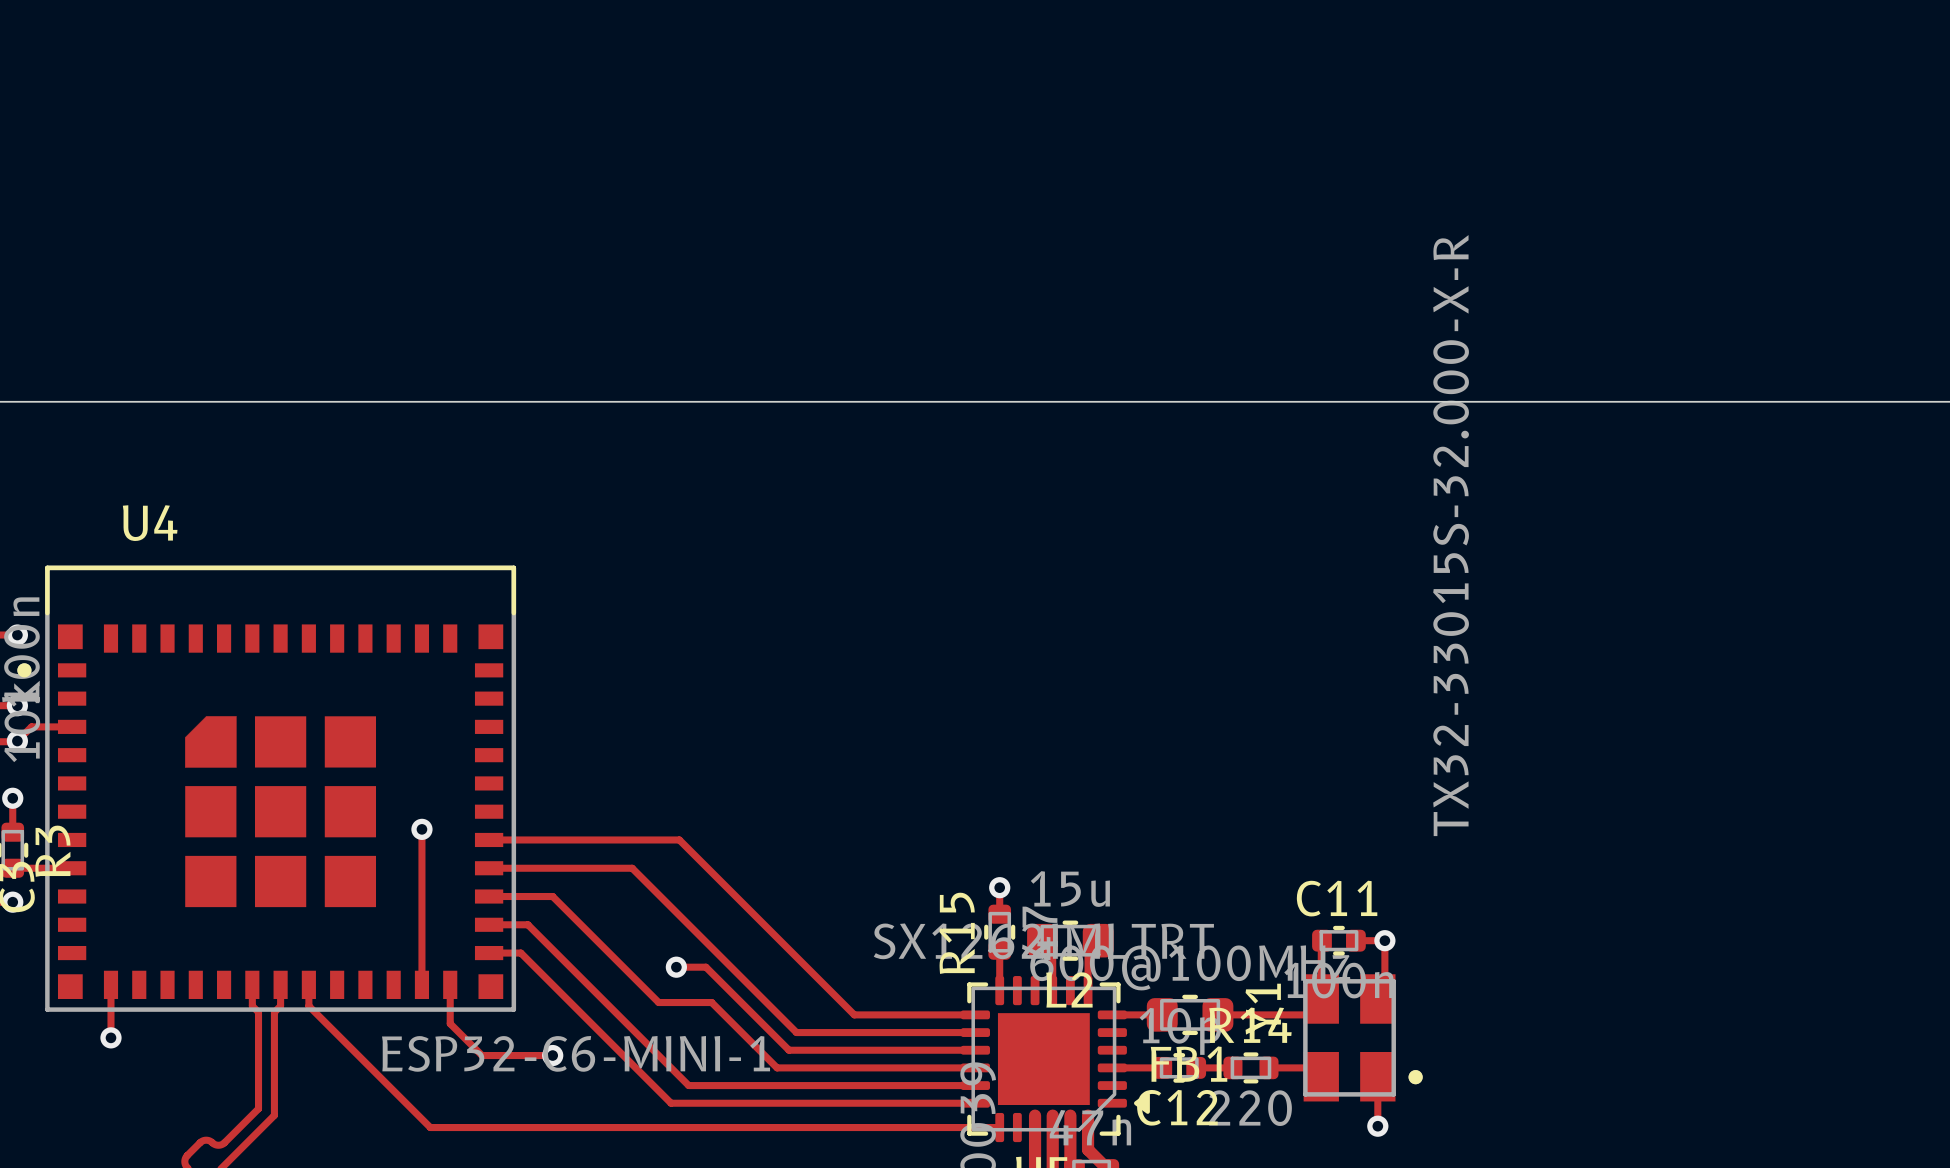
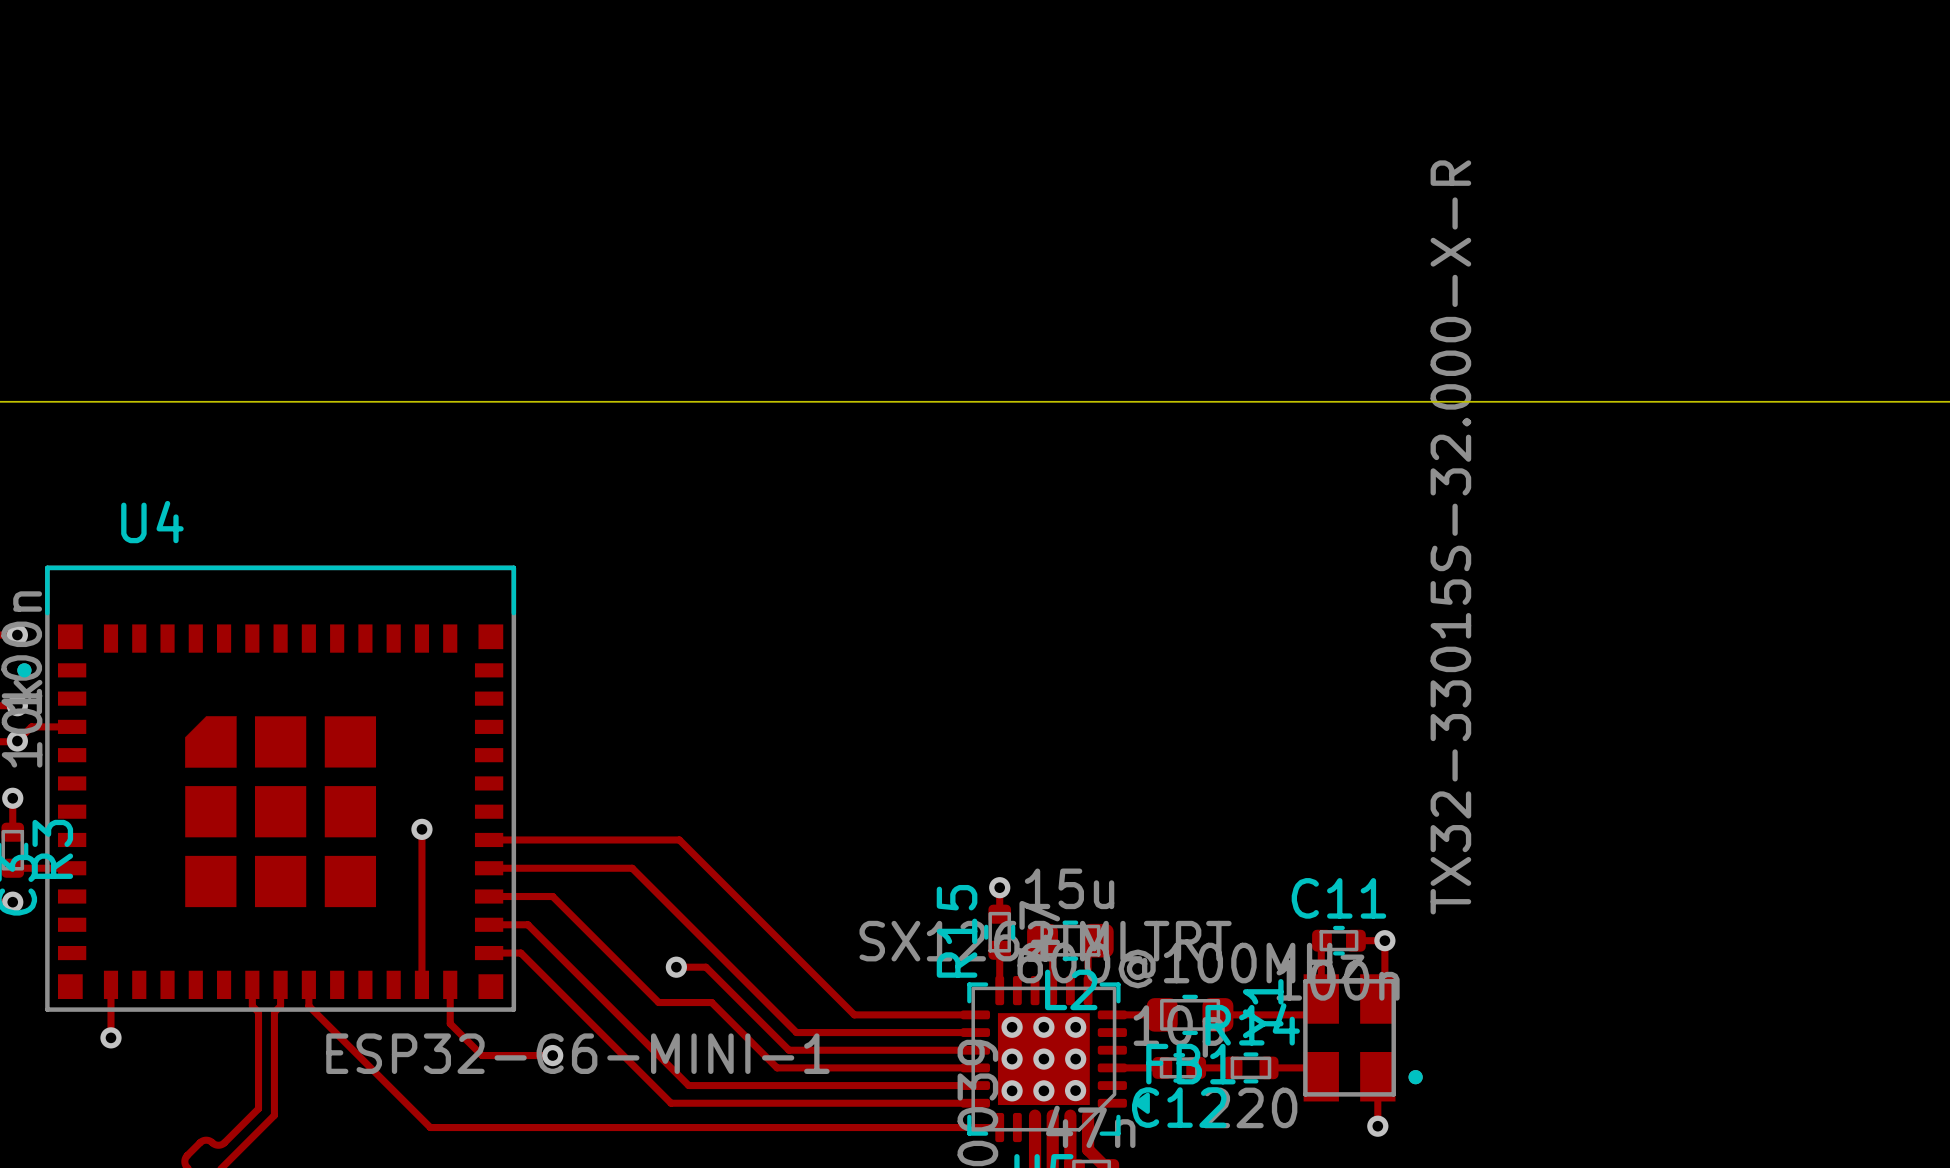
via: none -> (1012, 1027)
via: none -> (1043, 1027)
via: none -> (1075, 1027)
via: none -> (1012, 1059)
via: none -> (1043, 1059)
via: none -> (1075, 1059)
via: none -> (1012, 1090)
via: none -> (1043, 1090)
via: none -> (1075, 1090)

